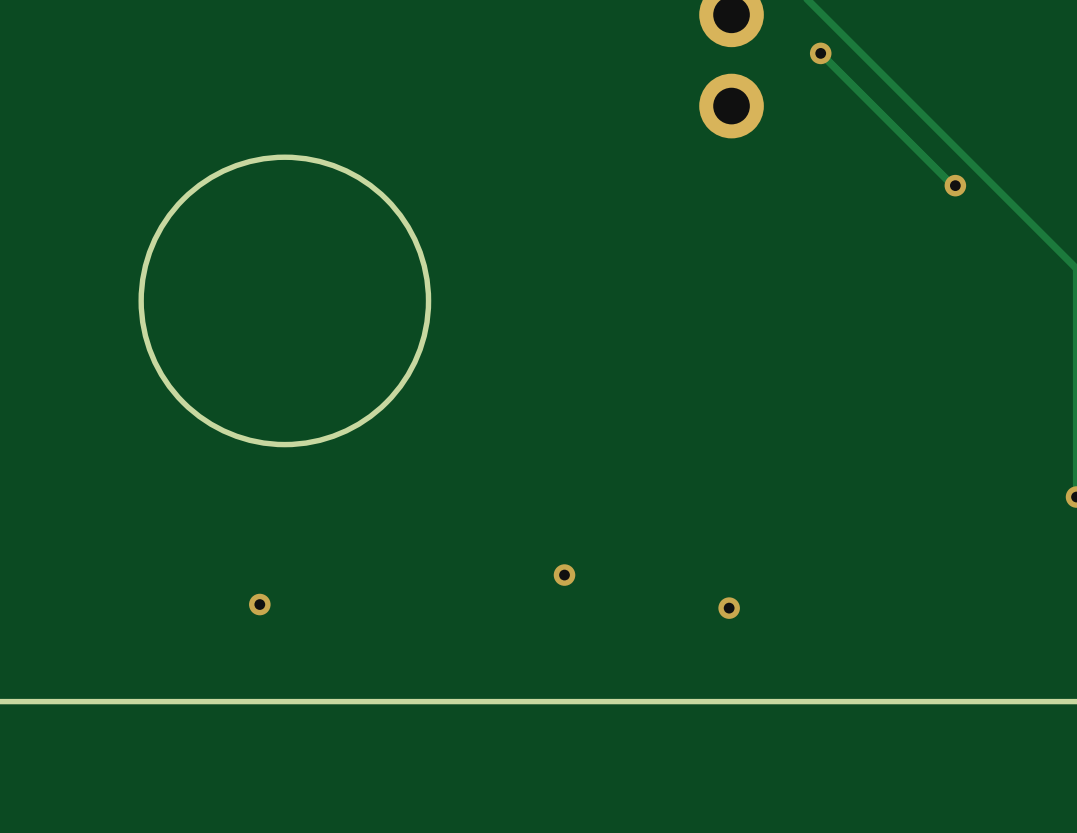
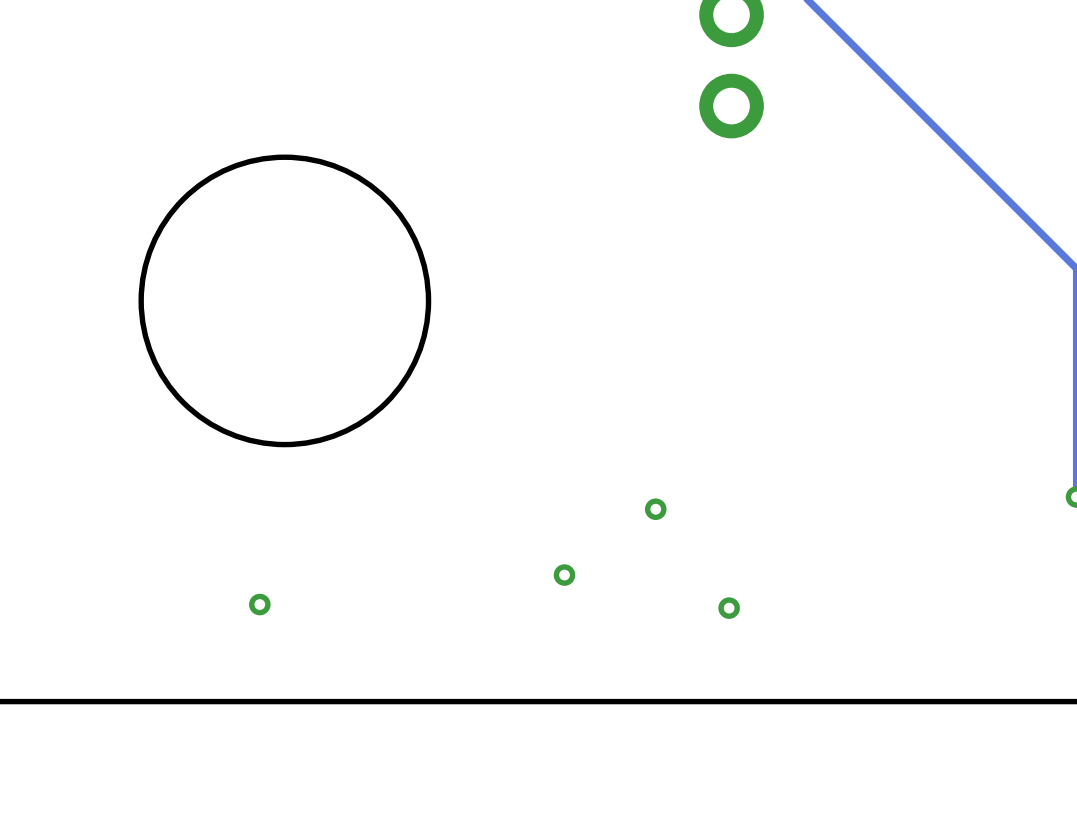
track: (820, 53) (952, 185) (955, 185) -> none
via: (820, 53) -> none
via: (955, 185) -> none
via: none -> (655, 509)

